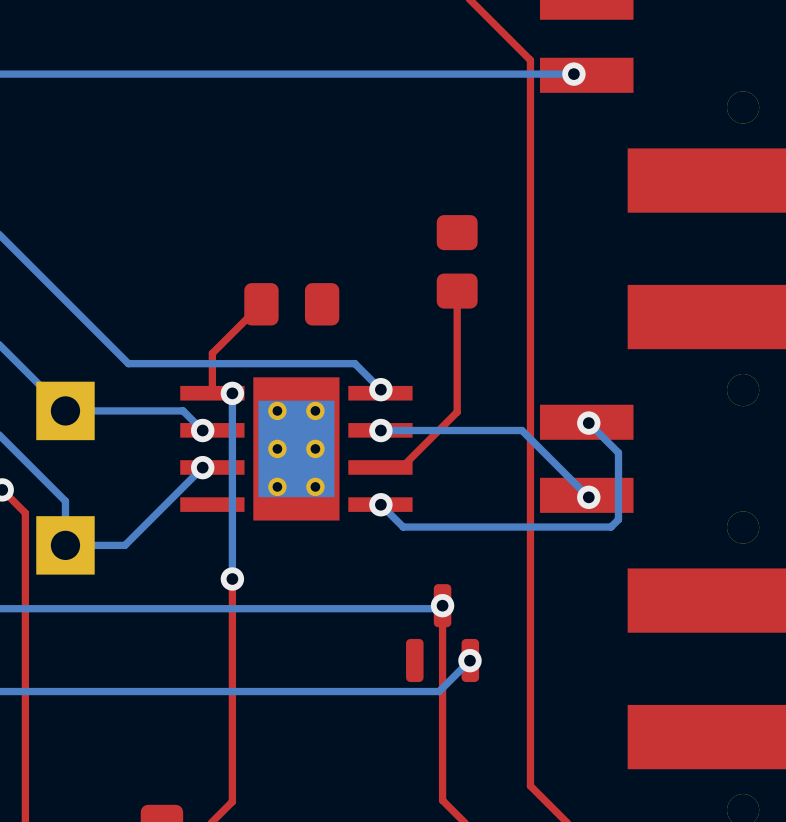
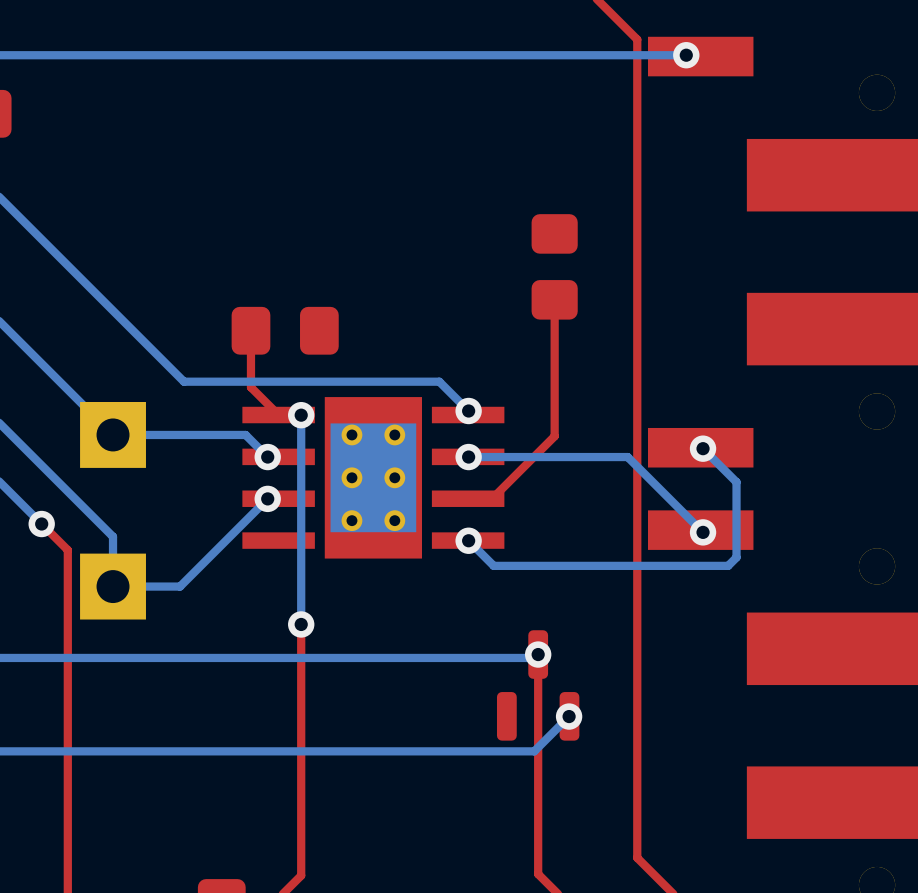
top track: (261, 304) (212, 353) (212, 393) -> (250, 331) (250, 387) (278, 415)
part position: (291, 304) -> (285, 330)

